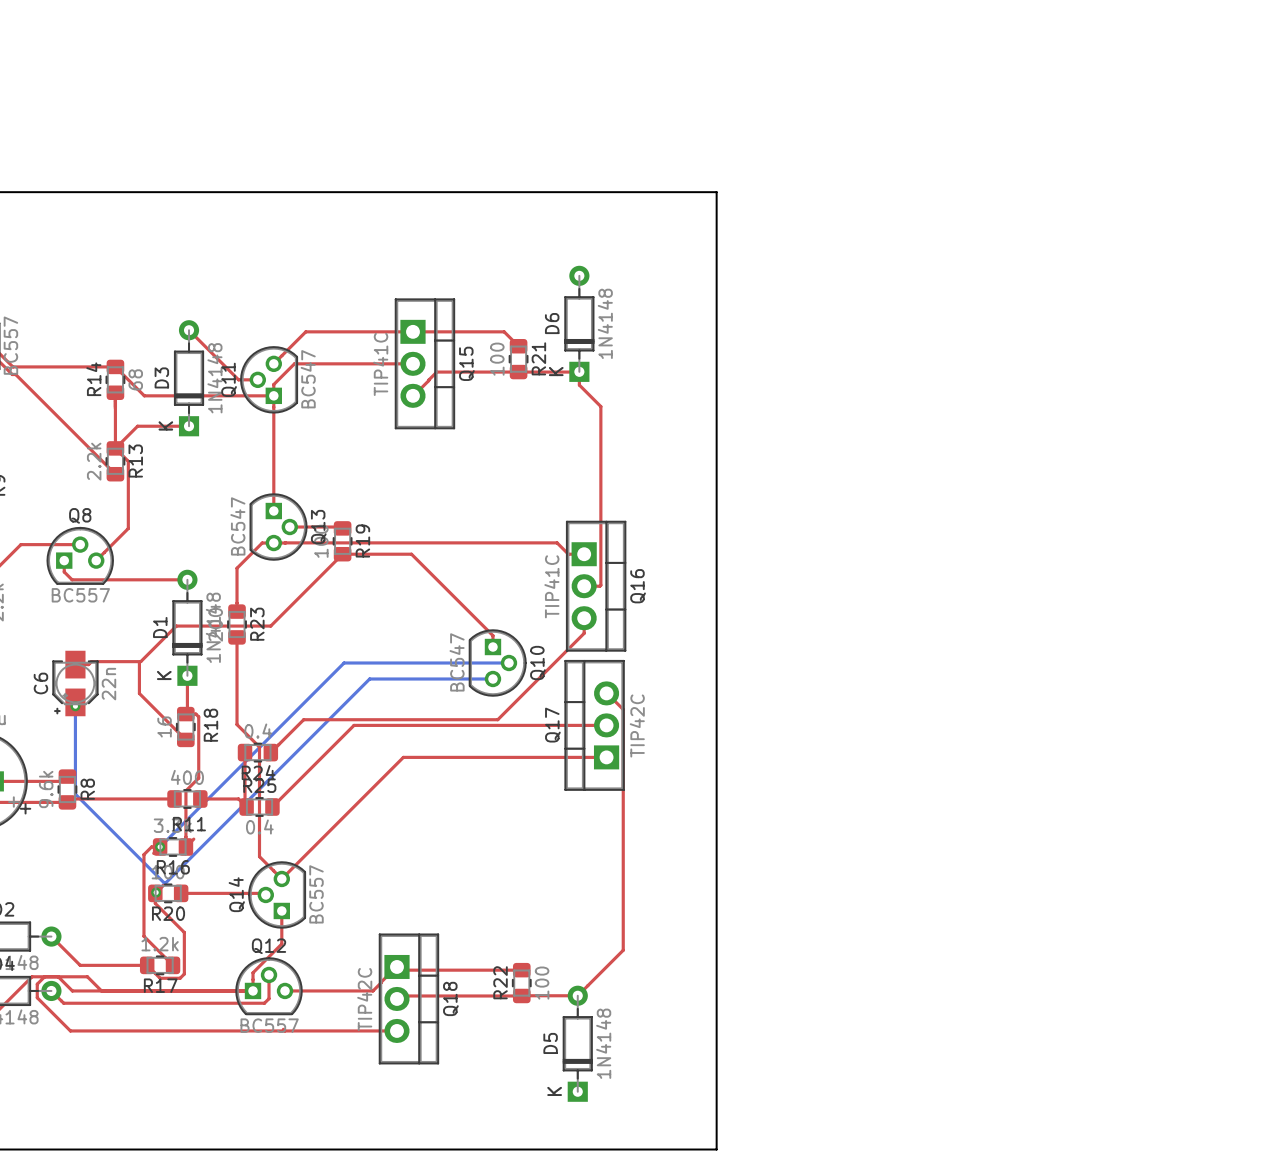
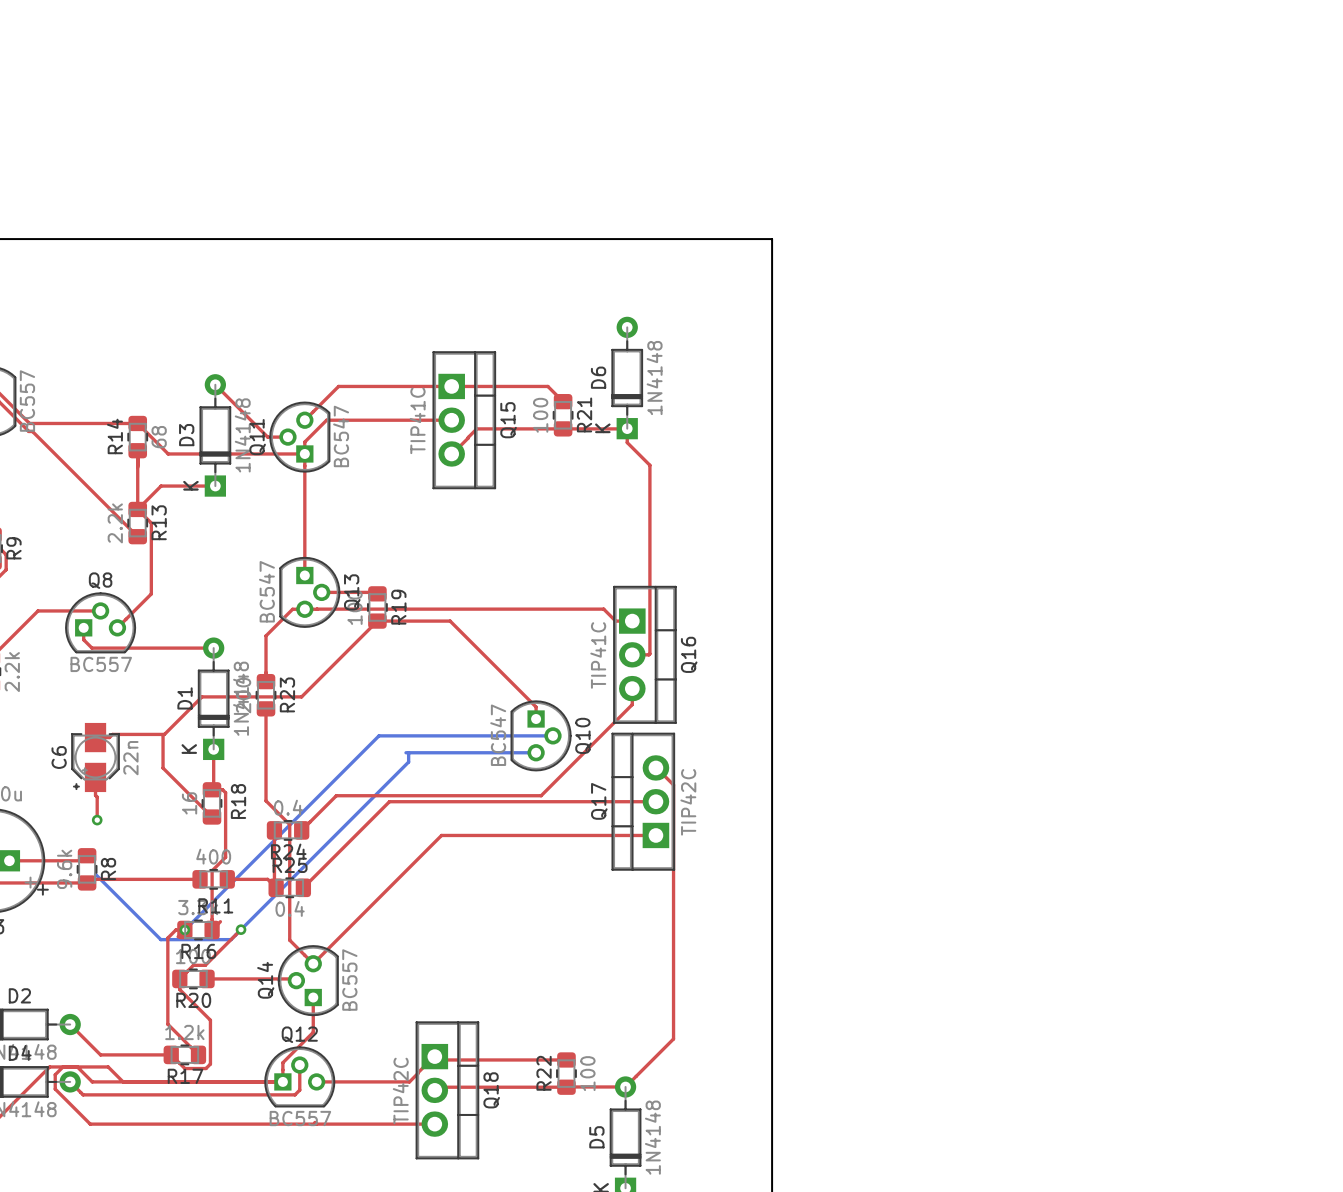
bottom track: (369, 679) (156, 892) -> none
top track: none -> (95, 777) (97, 820)
bottom track: (75, 706) (75, 794) -> none
via position: (75, 706) -> (97, 820)
top track: none -> (241, 929) (205, 965) (193, 965) (188, 970)
bottom track: (137, 856) (164, 883) -> (160, 939) (231, 939) (408, 762) (408, 752)
via position: (156, 892) -> (241, 929)

